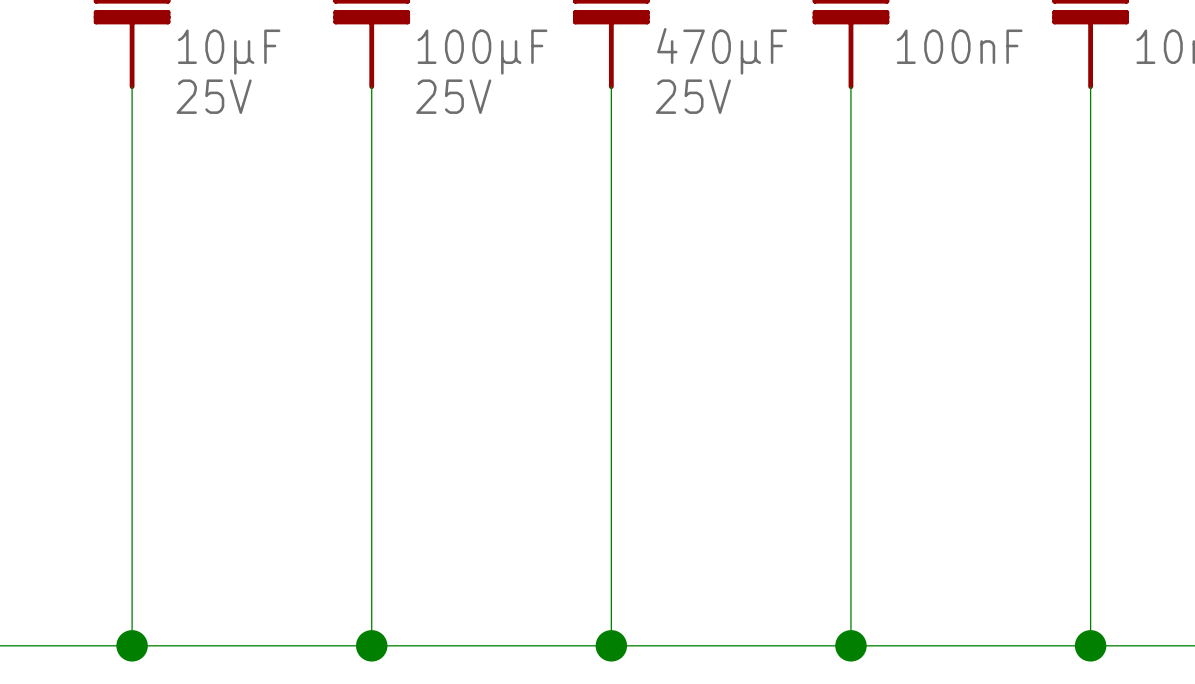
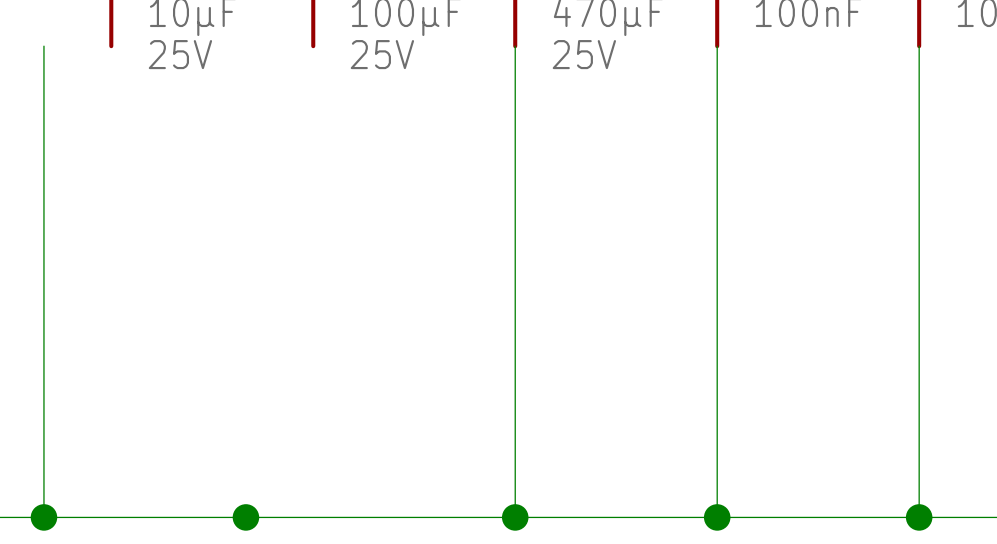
wire: (132, 86) (132, 645) -> (43, 46) (43, 517)
wire: (371, 86) (371, 645) -> none
junction: none -> (43, 517)
junction: (132, 645) -> none
junction: none -> (245, 517)
junction: (371, 645) -> none

